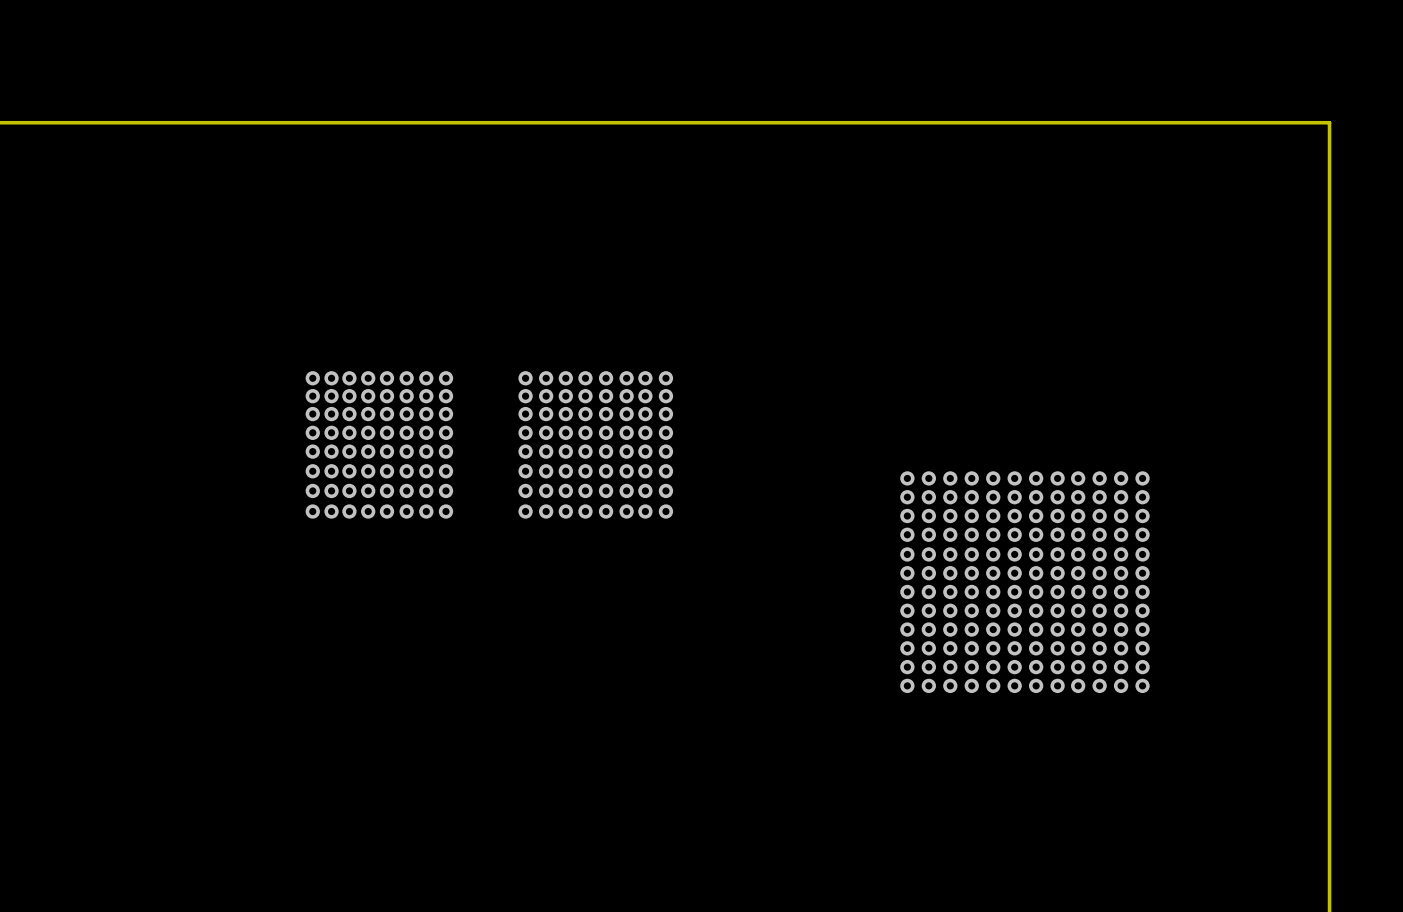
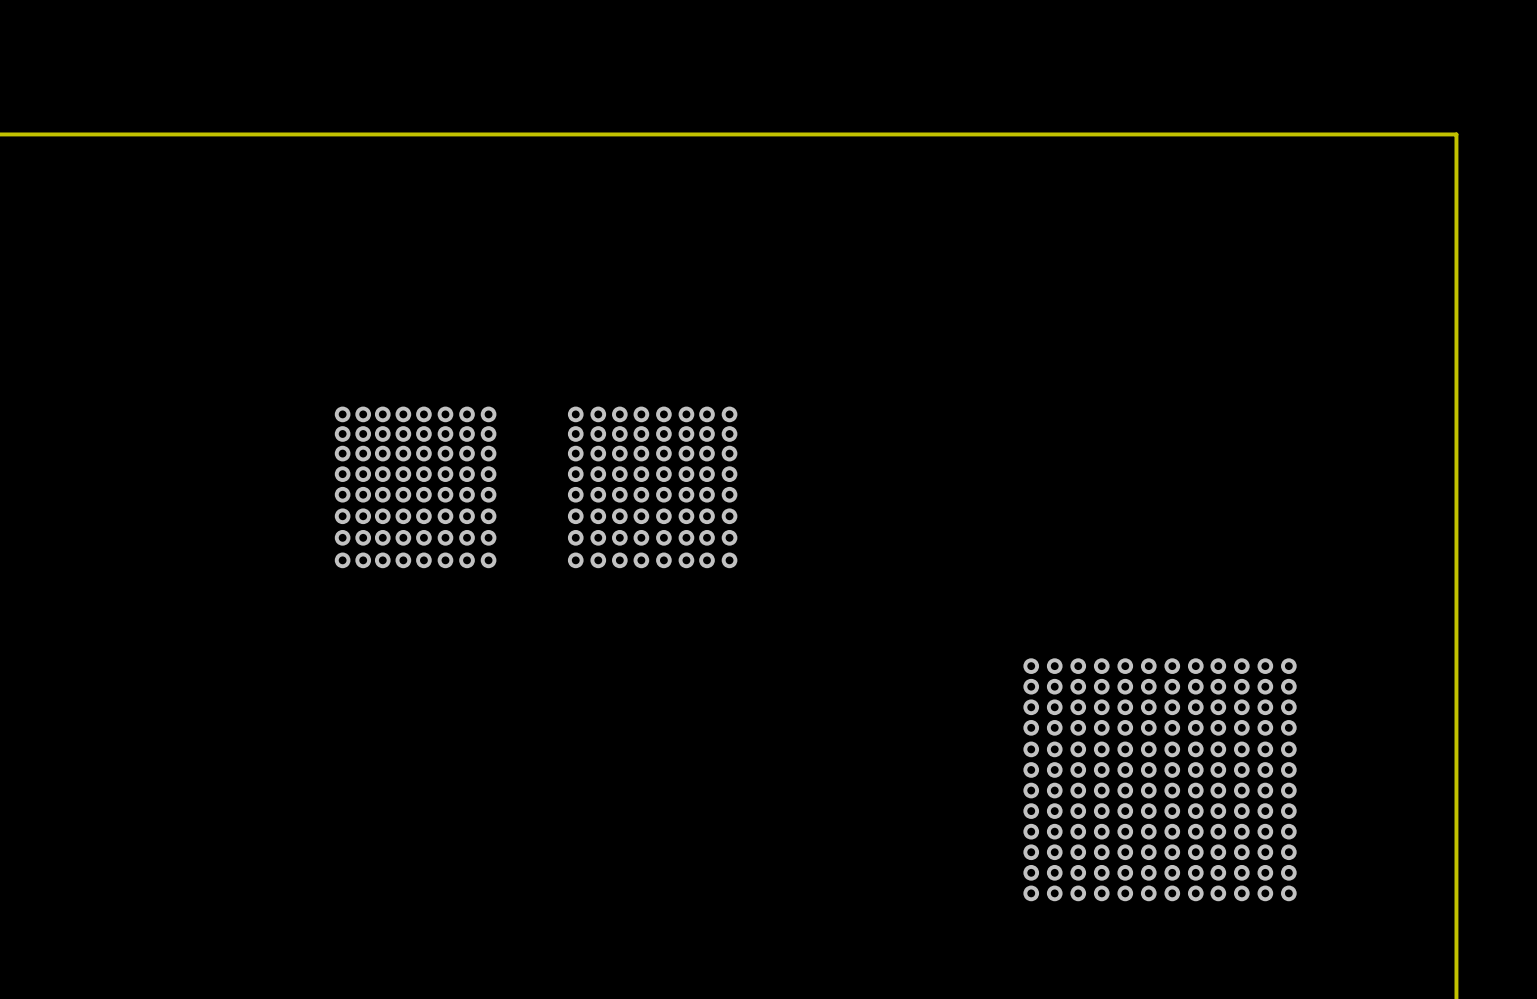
via: (907, 478) -> none
via: (928, 478) -> none
via: (950, 478) -> none
via: (971, 478) -> none
via: (993, 478) -> none
via: (1014, 478) -> none
via: (1036, 478) -> none
via: (1057, 478) -> none
via: (1078, 478) -> none
via: (1099, 478) -> none
via: (1121, 478) -> none
via: (1142, 478) -> none
via: (907, 497) -> none
via: (928, 497) -> none
via: (950, 497) -> none
via: (971, 497) -> none
via: (993, 497) -> none
via: (1014, 497) -> none
via: (1036, 497) -> none
via: (1057, 497) -> none
via: (1078, 497) -> none
via: (1099, 497) -> none
via: (1121, 497) -> none
via: (1142, 497) -> none
via: (907, 515) -> none
via: (928, 515) -> none
via: (950, 515) -> none
via: (971, 515) -> none
via: (993, 515) -> none
via: (1014, 515) -> none
via: (1036, 515) -> none
via: (1057, 515) -> none
via: (1078, 515) -> none
via: (1099, 515) -> none
via: (1121, 515) -> none
via: (1142, 515) -> none
via: (907, 534) -> none
via: (928, 534) -> none
via: (950, 534) -> none
via: (971, 534) -> none
via: (993, 534) -> none
via: (1014, 534) -> none
via: (1036, 534) -> none
via: (1057, 534) -> none
via: (1078, 534) -> none
via: (1099, 534) -> none
via: (1121, 534) -> none
via: (1142, 534) -> none
via: (907, 554) -> none
via: (928, 554) -> none
via: (950, 554) -> none
via: (971, 554) -> none
via: (993, 554) -> none
via: (1014, 554) -> none
via: (1036, 554) -> none
via: (1057, 554) -> none
via: (1078, 554) -> none
via: (1099, 554) -> none
via: (1121, 554) -> none
via: (1142, 554) -> none
via: (907, 573) -> none
via: (928, 573) -> none
via: (950, 573) -> none
via: (971, 573) -> none
via: (993, 573) -> none
via: (1014, 573) -> none
via: (1036, 573) -> none
via: (1057, 573) -> none
via: (1078, 573) -> none
via: (1099, 573) -> none
via: (1121, 573) -> none
via: (1142, 573) -> none
via: (907, 591) -> none
via: (928, 591) -> none
via: (950, 591) -> none
via: (971, 591) -> none
via: (993, 591) -> none
via: (1014, 591) -> none
via: (1036, 591) -> none
via: (1057, 591) -> none
via: (1078, 591) -> none
via: (1099, 591) -> none
via: (1121, 591) -> none
via: (1142, 591) -> none
via: none -> (1031, 666)
via: none -> (1054, 666)
via: none -> (1078, 666)
via: none -> (1101, 666)
via: none -> (1125, 666)
via: none -> (1148, 666)
via: none -> (1172, 666)
via: none -> (1195, 666)
via: none -> (1218, 666)
via: none -> (1241, 666)
via: none -> (1265, 666)
via: none -> (1288, 666)
via: (907, 610) -> none
via: (928, 610) -> none
via: (950, 610) -> none
via: (971, 610) -> none
via: (993, 610) -> none
via: (1014, 610) -> none
via: (1036, 610) -> none
via: (1057, 610) -> none
via: (1078, 610) -> none
via: (1099, 610) -> none
via: (1121, 610) -> none
via: (1142, 610) -> none
via: none -> (1031, 686)
via: none -> (1054, 686)
via: none -> (1078, 686)
via: none -> (1101, 686)
via: none -> (1125, 686)
via: none -> (1148, 686)
via: none -> (1172, 686)
via: none -> (1195, 686)
via: none -> (1218, 686)
via: none -> (1241, 686)
via: none -> (1265, 686)
via: none -> (1288, 686)
via: (907, 629) -> none
via: (928, 629) -> none
via: (950, 629) -> none
via: (971, 629) -> none
via: (993, 629) -> none
via: (1014, 629) -> none
via: (1036, 629) -> none
via: (1057, 629) -> none
via: (1078, 629) -> none
via: (1099, 629) -> none
via: (1121, 629) -> none
via: (1142, 629) -> none
via: none -> (1031, 707)
via: none -> (1054, 707)
via: none -> (1078, 707)
via: none -> (1101, 707)
via: none -> (1125, 707)
via: none -> (1148, 707)
via: none -> (1172, 707)
via: none -> (1195, 707)
via: none -> (1218, 707)
via: none -> (1241, 707)
via: none -> (1265, 707)
via: none -> (1288, 707)
via: (907, 648) -> none
via: (928, 648) -> none
via: (950, 648) -> none
via: (971, 648) -> none
via: (993, 648) -> none
via: (1014, 648) -> none
via: (1036, 648) -> none
via: (1057, 648) -> none
via: (1078, 648) -> none
via: (1099, 648) -> none
via: (1121, 648) -> none
via: (1142, 648) -> none
via: none -> (1031, 727)
via: none -> (1054, 727)
via: none -> (1078, 727)
via: none -> (1101, 727)
via: none -> (1125, 727)
via: none -> (1148, 727)
via: none -> (1172, 727)
via: none -> (1195, 727)
via: none -> (1218, 727)
via: none -> (1241, 727)
via: none -> (1265, 727)
via: none -> (1288, 727)
via: (907, 667) -> none
via: (928, 667) -> none
via: (950, 667) -> none
via: (971, 667) -> none
via: (993, 667) -> none
via: (1014, 667) -> none
via: (1036, 667) -> none
via: (1057, 667) -> none
via: (1078, 667) -> none
via: (1099, 667) -> none
via: (1121, 667) -> none
via: (1142, 667) -> none
via: none -> (1031, 749)
via: none -> (1054, 749)
via: none -> (1078, 749)
via: none -> (1101, 749)
via: none -> (1125, 749)
via: none -> (1148, 749)
via: none -> (1172, 749)
via: none -> (1195, 749)
via: none -> (1218, 749)
via: none -> (1241, 749)
via: none -> (1265, 749)
via: none -> (1288, 749)
via: (907, 685) -> none
via: (928, 685) -> none
via: (950, 685) -> none
via: (971, 685) -> none
via: (993, 685) -> none
via: (1014, 685) -> none
via: (1036, 685) -> none
via: (1057, 685) -> none
via: (1078, 685) -> none
via: (1099, 685) -> none
via: (1121, 685) -> none
via: (1142, 685) -> none
via: none -> (1031, 769)
via: none -> (1054, 769)
via: none -> (1078, 769)
via: none -> (1101, 769)
via: none -> (1125, 769)
via: none -> (1148, 769)
via: none -> (1172, 769)
via: none -> (1195, 769)
via: none -> (1218, 769)
via: none -> (1241, 769)
via: none -> (1265, 769)
via: none -> (1288, 769)
via: none -> (1031, 790)
via: none -> (1054, 790)
via: none -> (1078, 790)
via: none -> (1101, 790)
via: none -> (1125, 790)
via: none -> (1148, 790)
via: none -> (1172, 790)
via: none -> (1195, 790)
via: none -> (1218, 790)
via: none -> (1241, 790)
via: none -> (1265, 790)
via: none -> (1288, 790)
via: none -> (1031, 811)
via: none -> (1054, 811)
via: none -> (1078, 811)
via: none -> (1101, 811)
via: none -> (1125, 811)
via: none -> (1148, 811)
via: none -> (1172, 811)
via: none -> (1195, 811)
via: none -> (1218, 811)
via: none -> (1241, 811)
via: none -> (1265, 811)
via: none -> (1288, 811)
via: none -> (1031, 831)
via: none -> (1054, 831)
via: none -> (1078, 831)
via: none -> (1101, 831)
via: none -> (1125, 831)
via: none -> (1148, 831)
via: none -> (1172, 831)
via: none -> (1195, 831)
via: none -> (1218, 831)
via: none -> (1241, 831)
via: none -> (1265, 831)
via: none -> (1288, 831)
via: none -> (1031, 852)
via: none -> (1054, 852)
via: none -> (1078, 852)
via: none -> (1101, 852)
via: none -> (1125, 852)
via: none -> (1148, 852)
via: none -> (1172, 852)
via: none -> (1195, 852)
via: none -> (1218, 852)
via: none -> (1241, 852)
via: none -> (1265, 852)
via: none -> (1288, 852)
via: none -> (1031, 872)
via: none -> (1054, 872)
via: none -> (1078, 872)
via: none -> (1101, 872)
via: none -> (1125, 872)
via: none -> (1148, 872)
via: none -> (1172, 872)
via: none -> (1195, 872)
via: none -> (1218, 872)
via: none -> (1241, 872)
via: none -> (1265, 872)
via: none -> (1288, 872)
via: none -> (1031, 893)
via: none -> (1054, 893)
via: none -> (1078, 893)
via: none -> (1101, 893)
via: none -> (1125, 893)
via: none -> (1148, 893)
via: none -> (1172, 893)
via: none -> (1195, 893)
via: none -> (1218, 893)
via: none -> (1241, 893)
via: none -> (1265, 893)
via: none -> (1288, 893)

